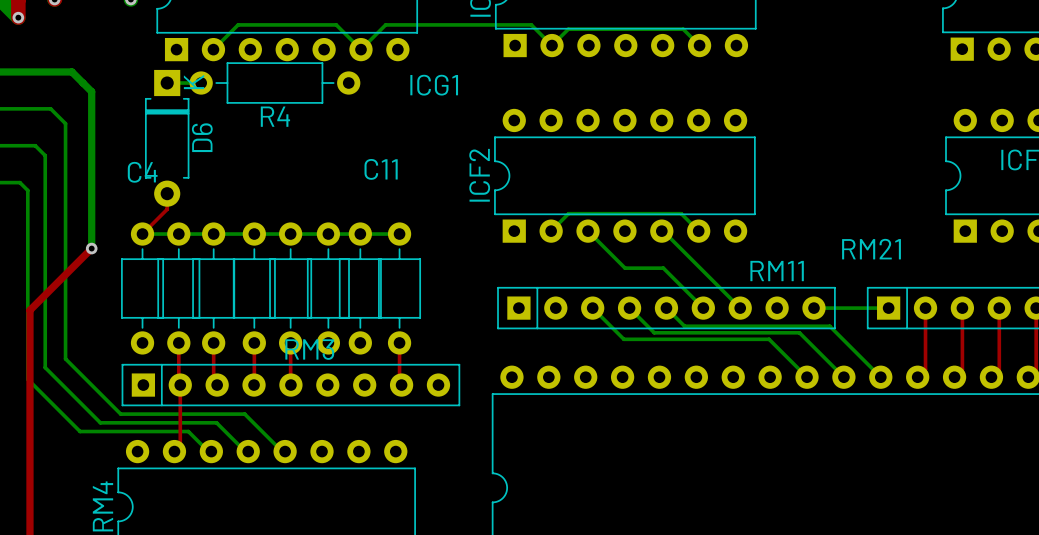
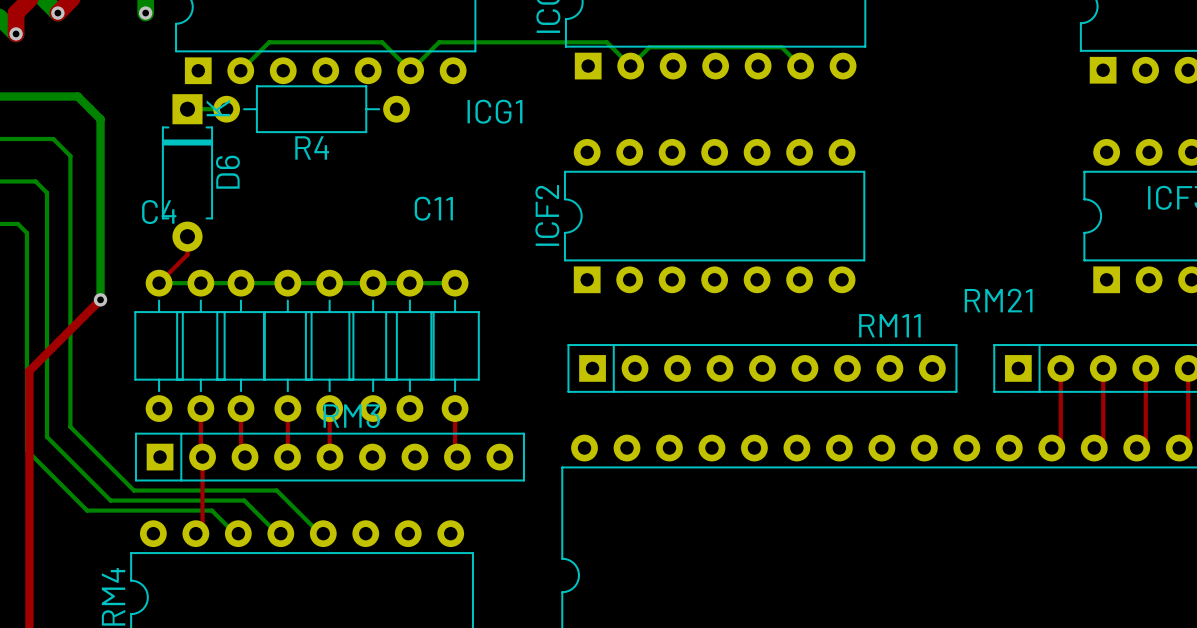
bottom track: (551, 231) (568, 213) (681, 213) (698, 231) -> none
bottom track: (588, 231) (625, 268) (663, 268) (703, 308) -> none
bottom track: (661, 231) (740, 308) -> none
bottom track: (592, 308) (623, 339) (769, 339) (807, 377) -> none
bottom track: (629, 308) (654, 332) (799, 332) (843, 377) -> none
bottom track: (666, 308) (684, 326) (829, 326) (880, 377) -> none
bottom track: (813, 308) (888, 308) -> none

